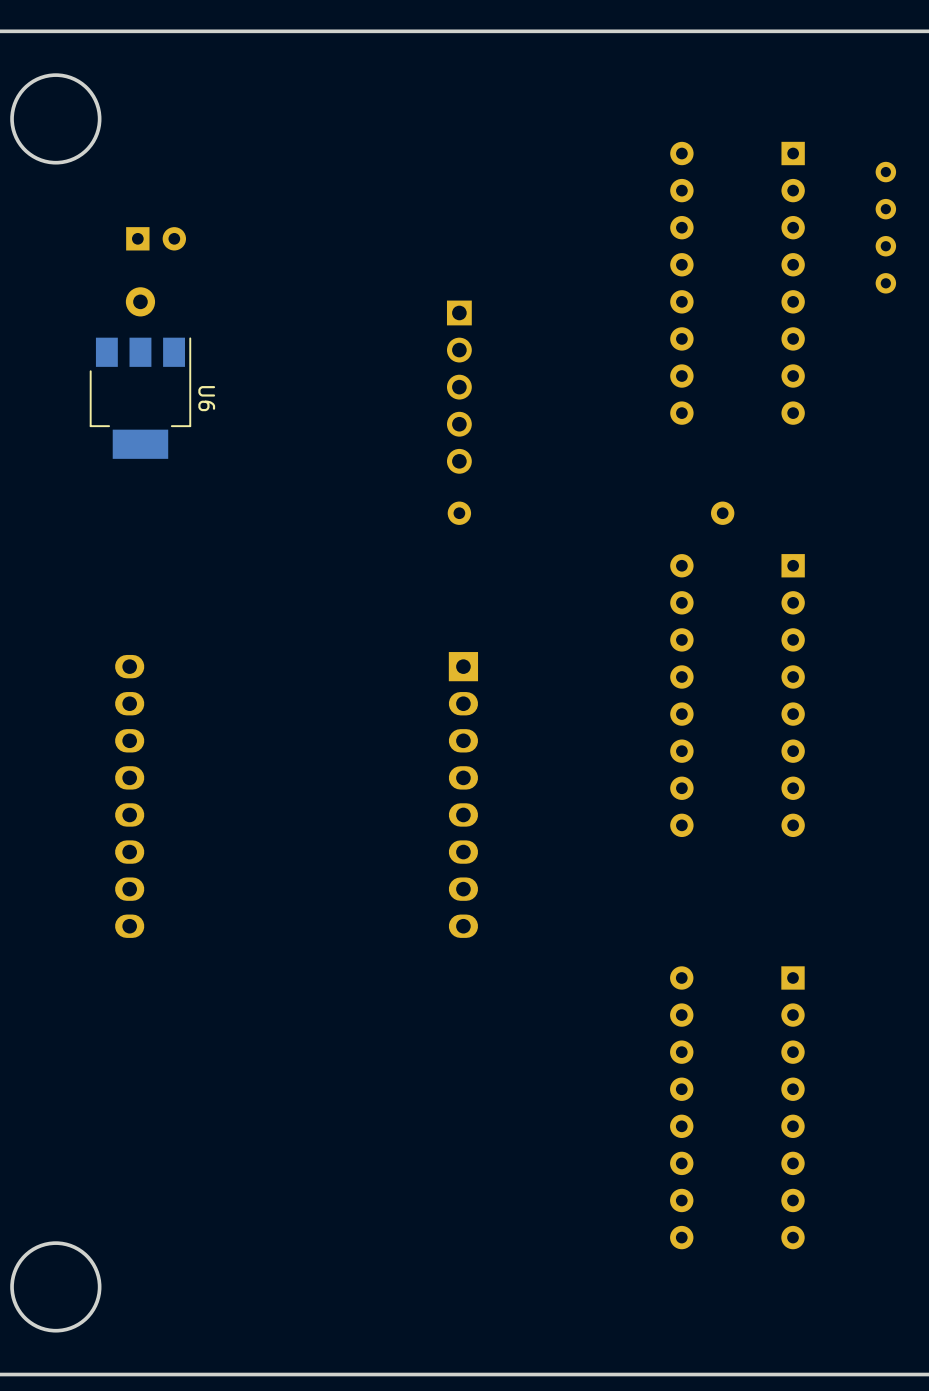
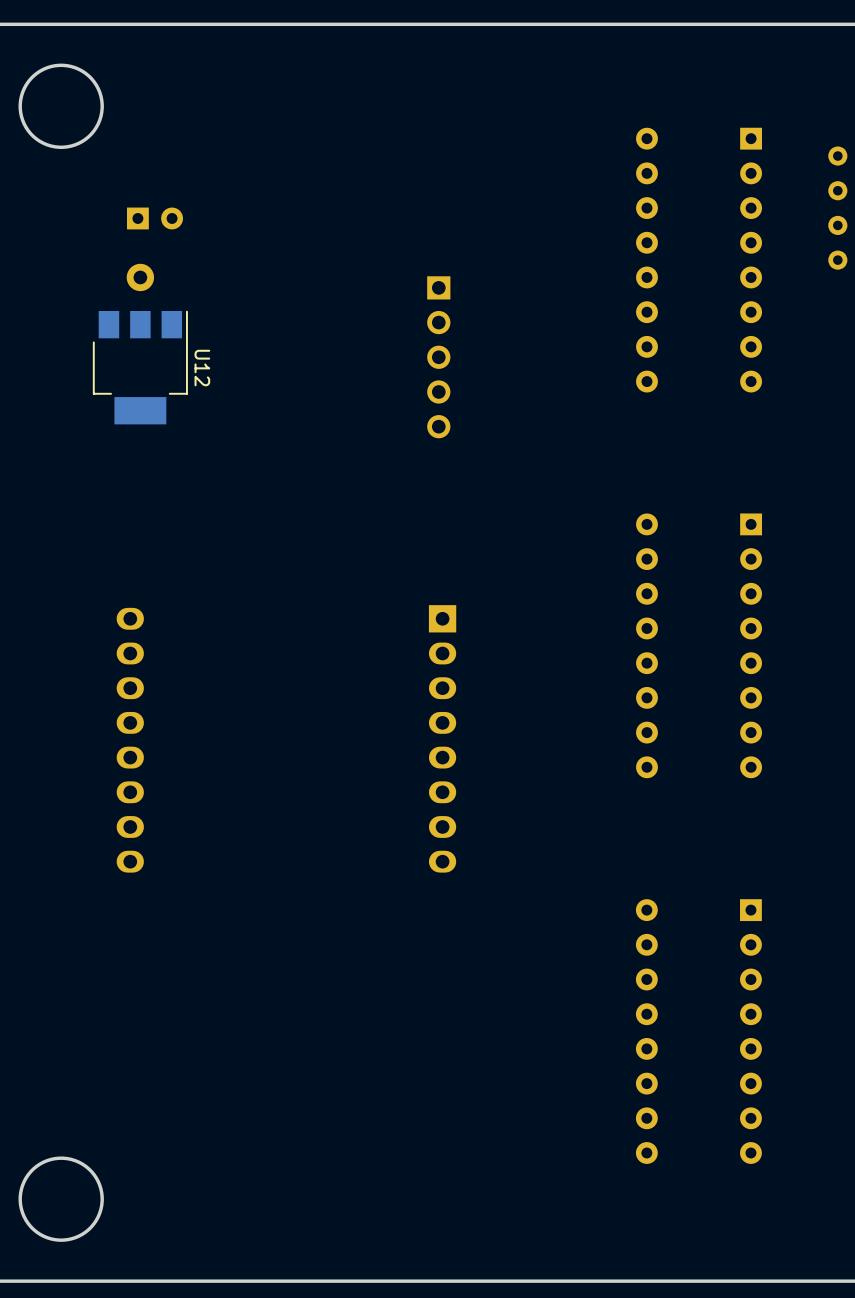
U6 name: U6 (206, 398) -> U12 (202, 368)
part: (459, 513) -> none
part: (722, 513) -> none

